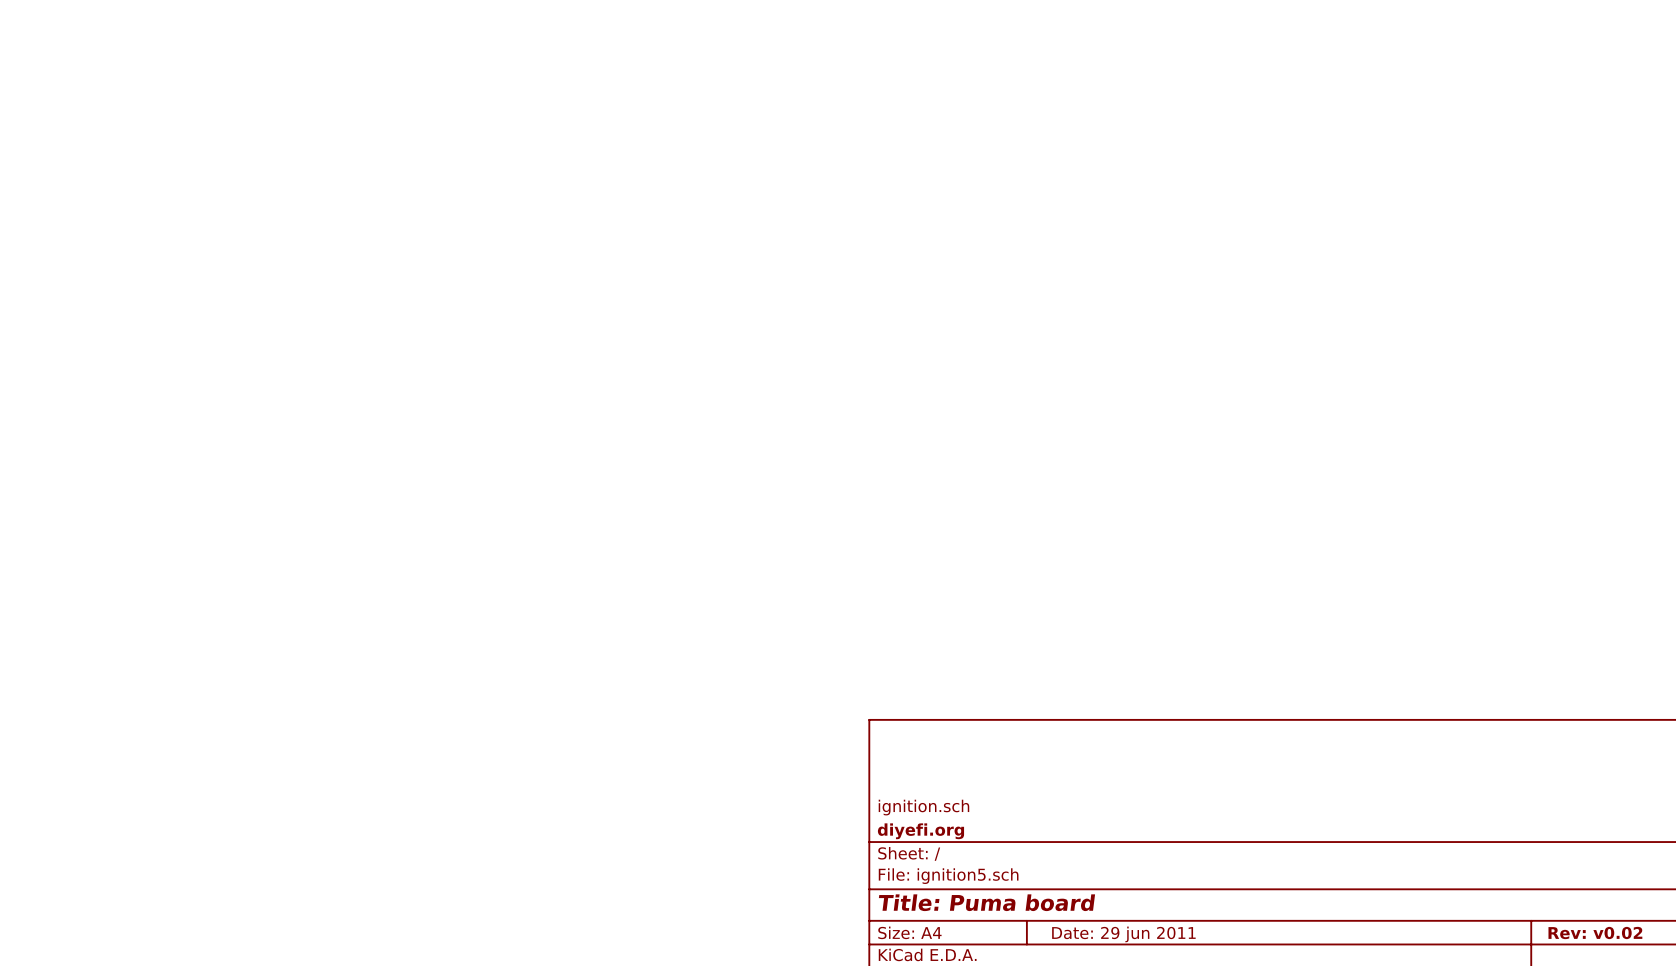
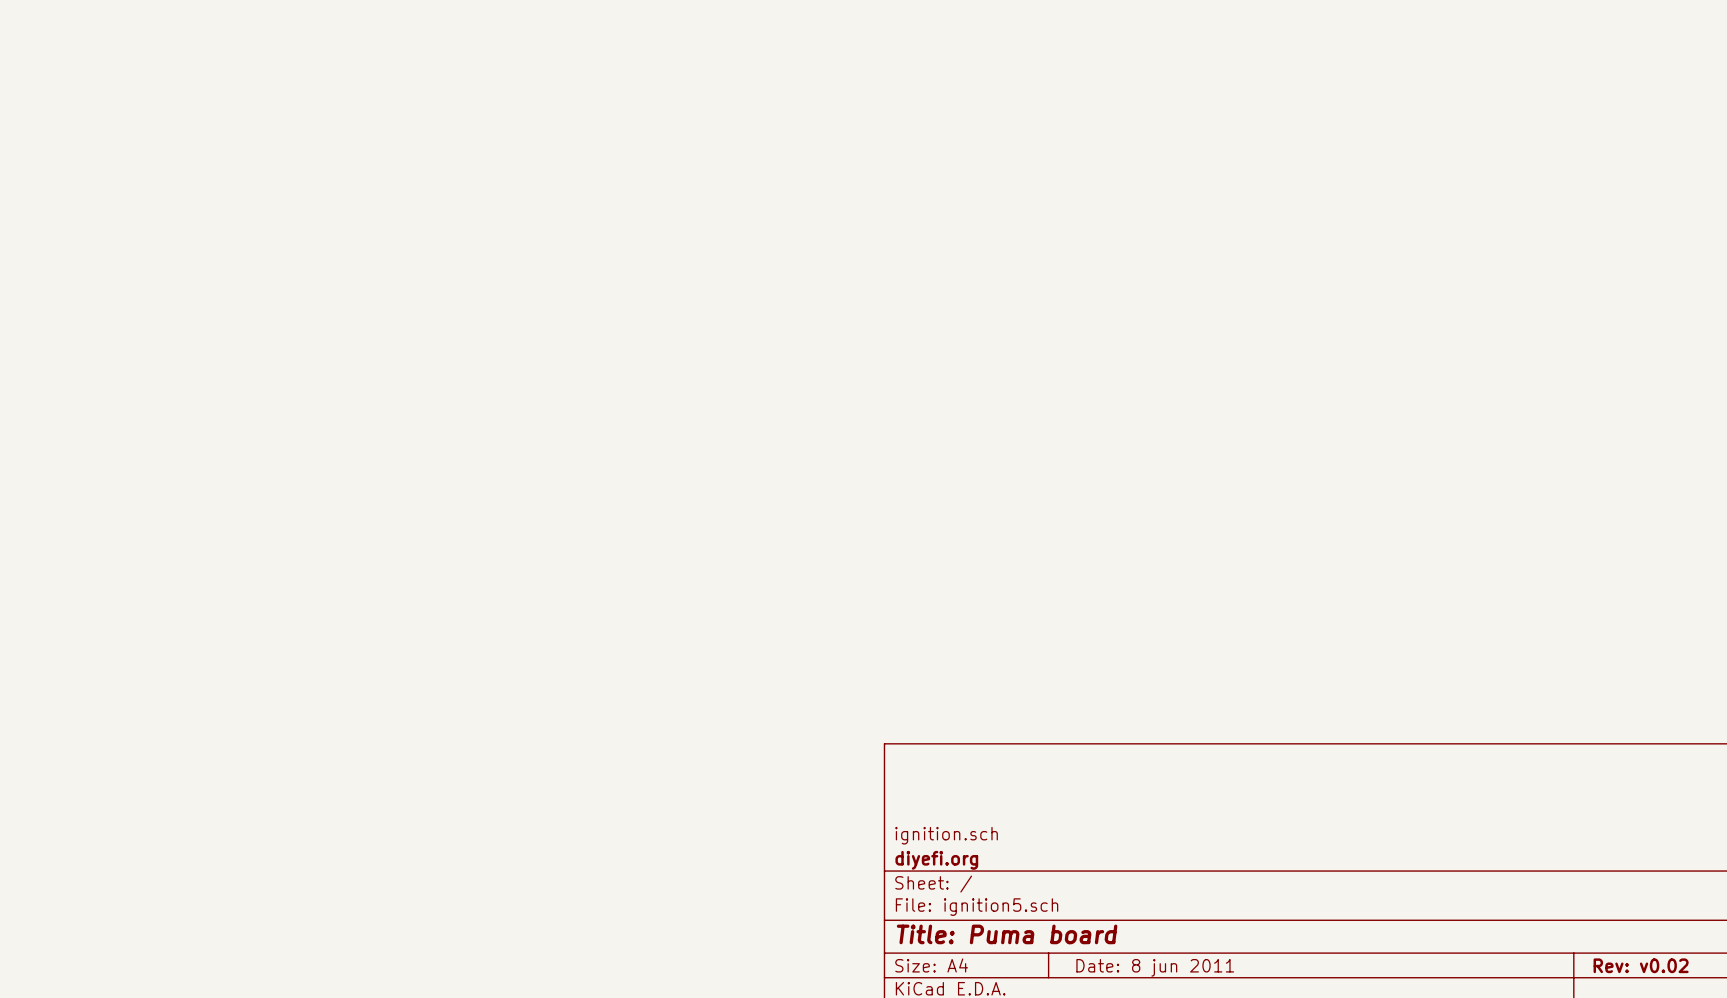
title block: Date: 29 jun 2011 (1123, 934) -> Date: 8 jun 2011 (1155, 967)

